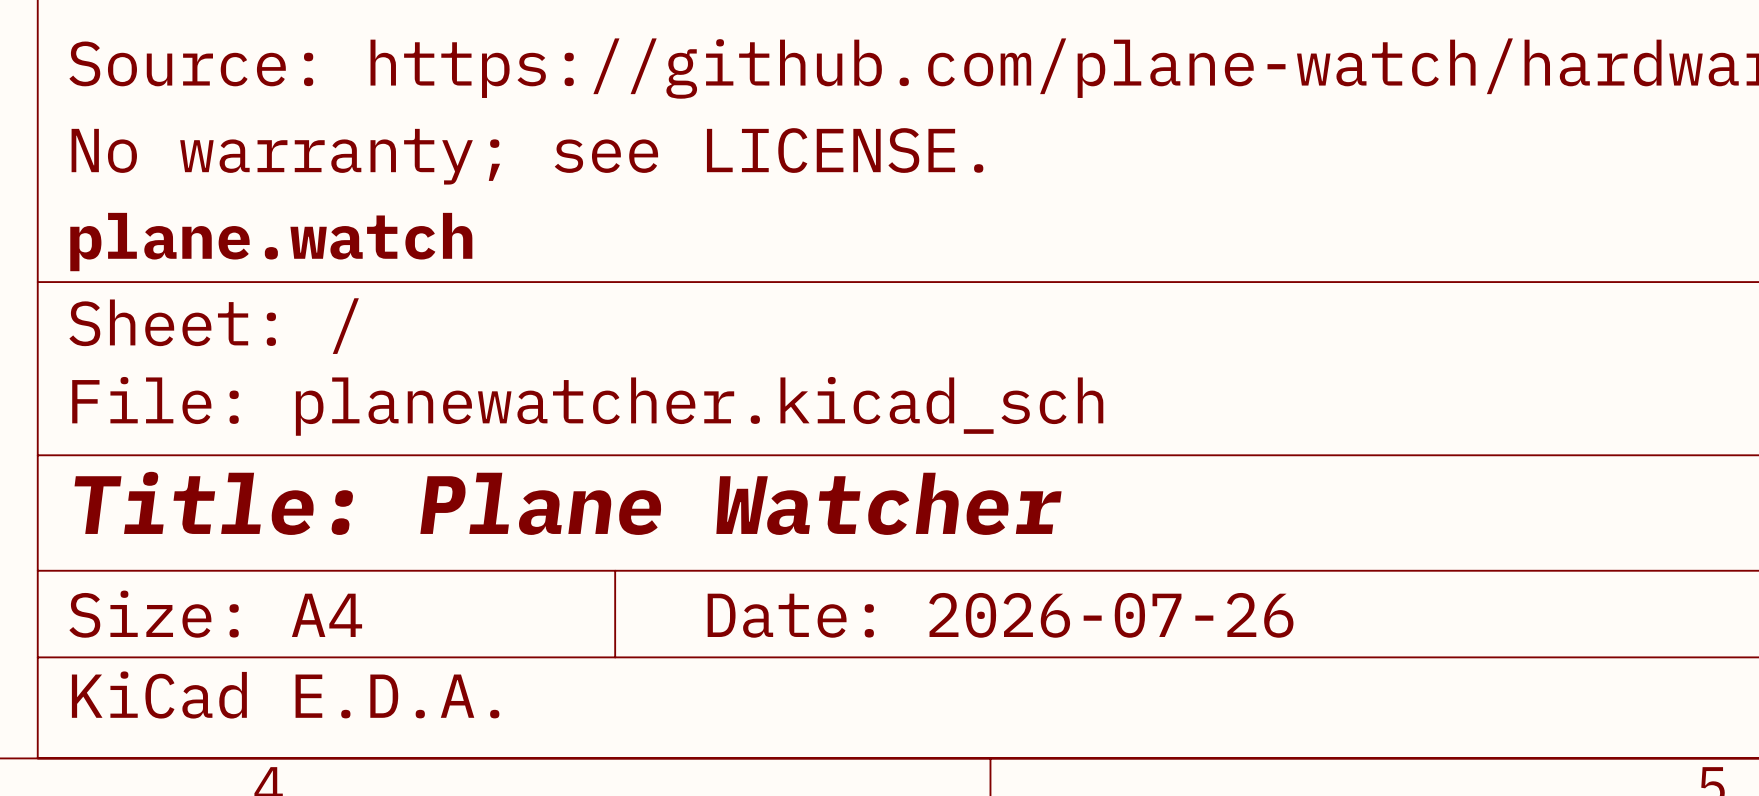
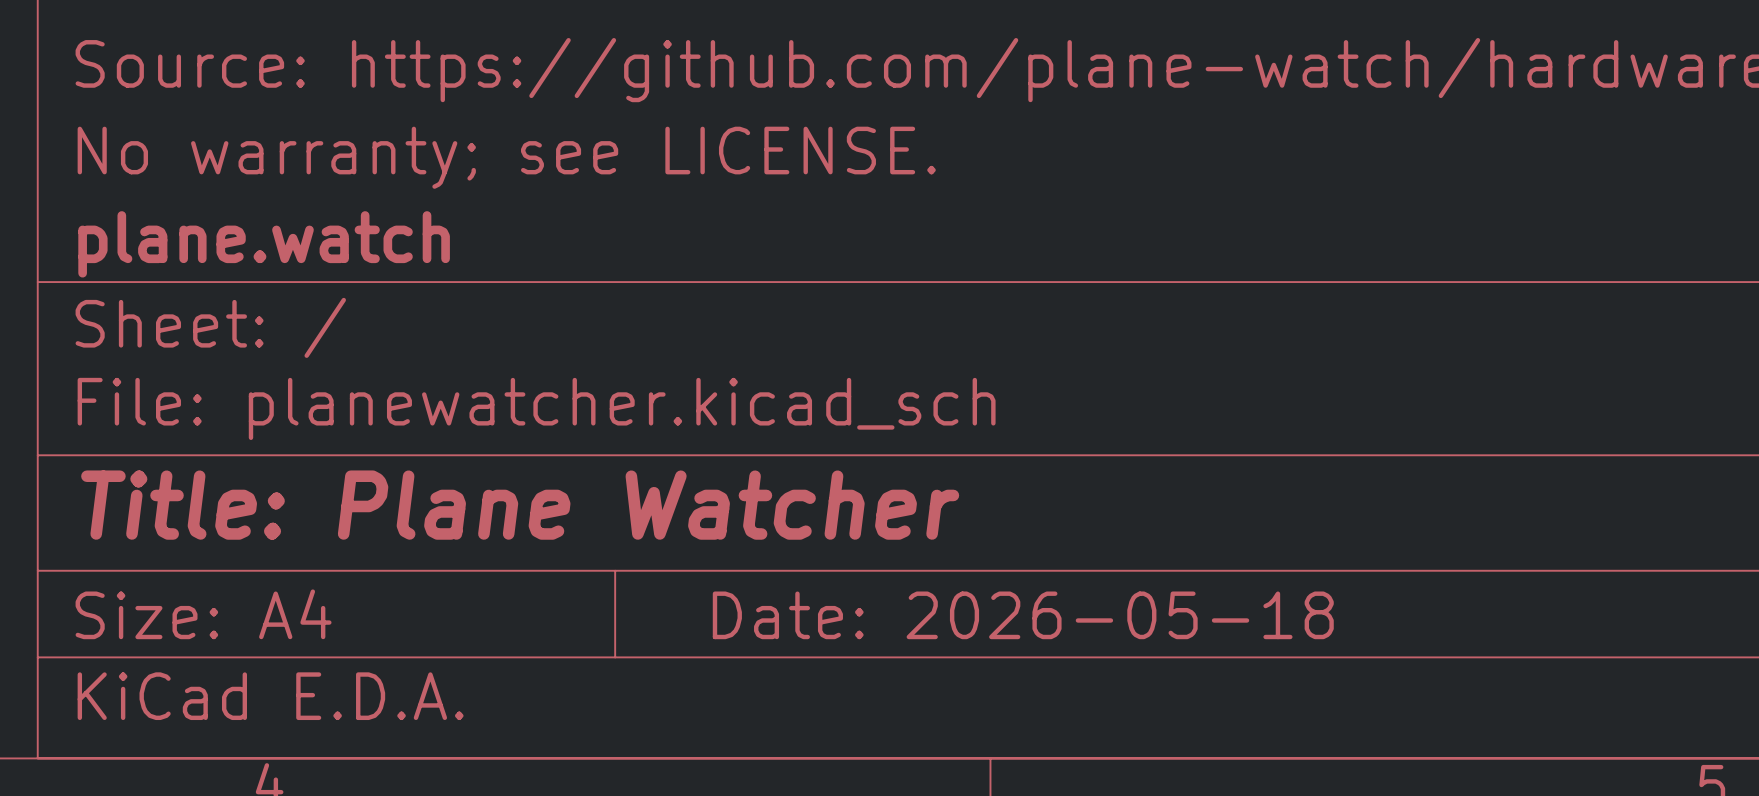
title block: Date: 2026-07-26 (1000, 615) -> Date: 2026-05-18 (1023, 615)

